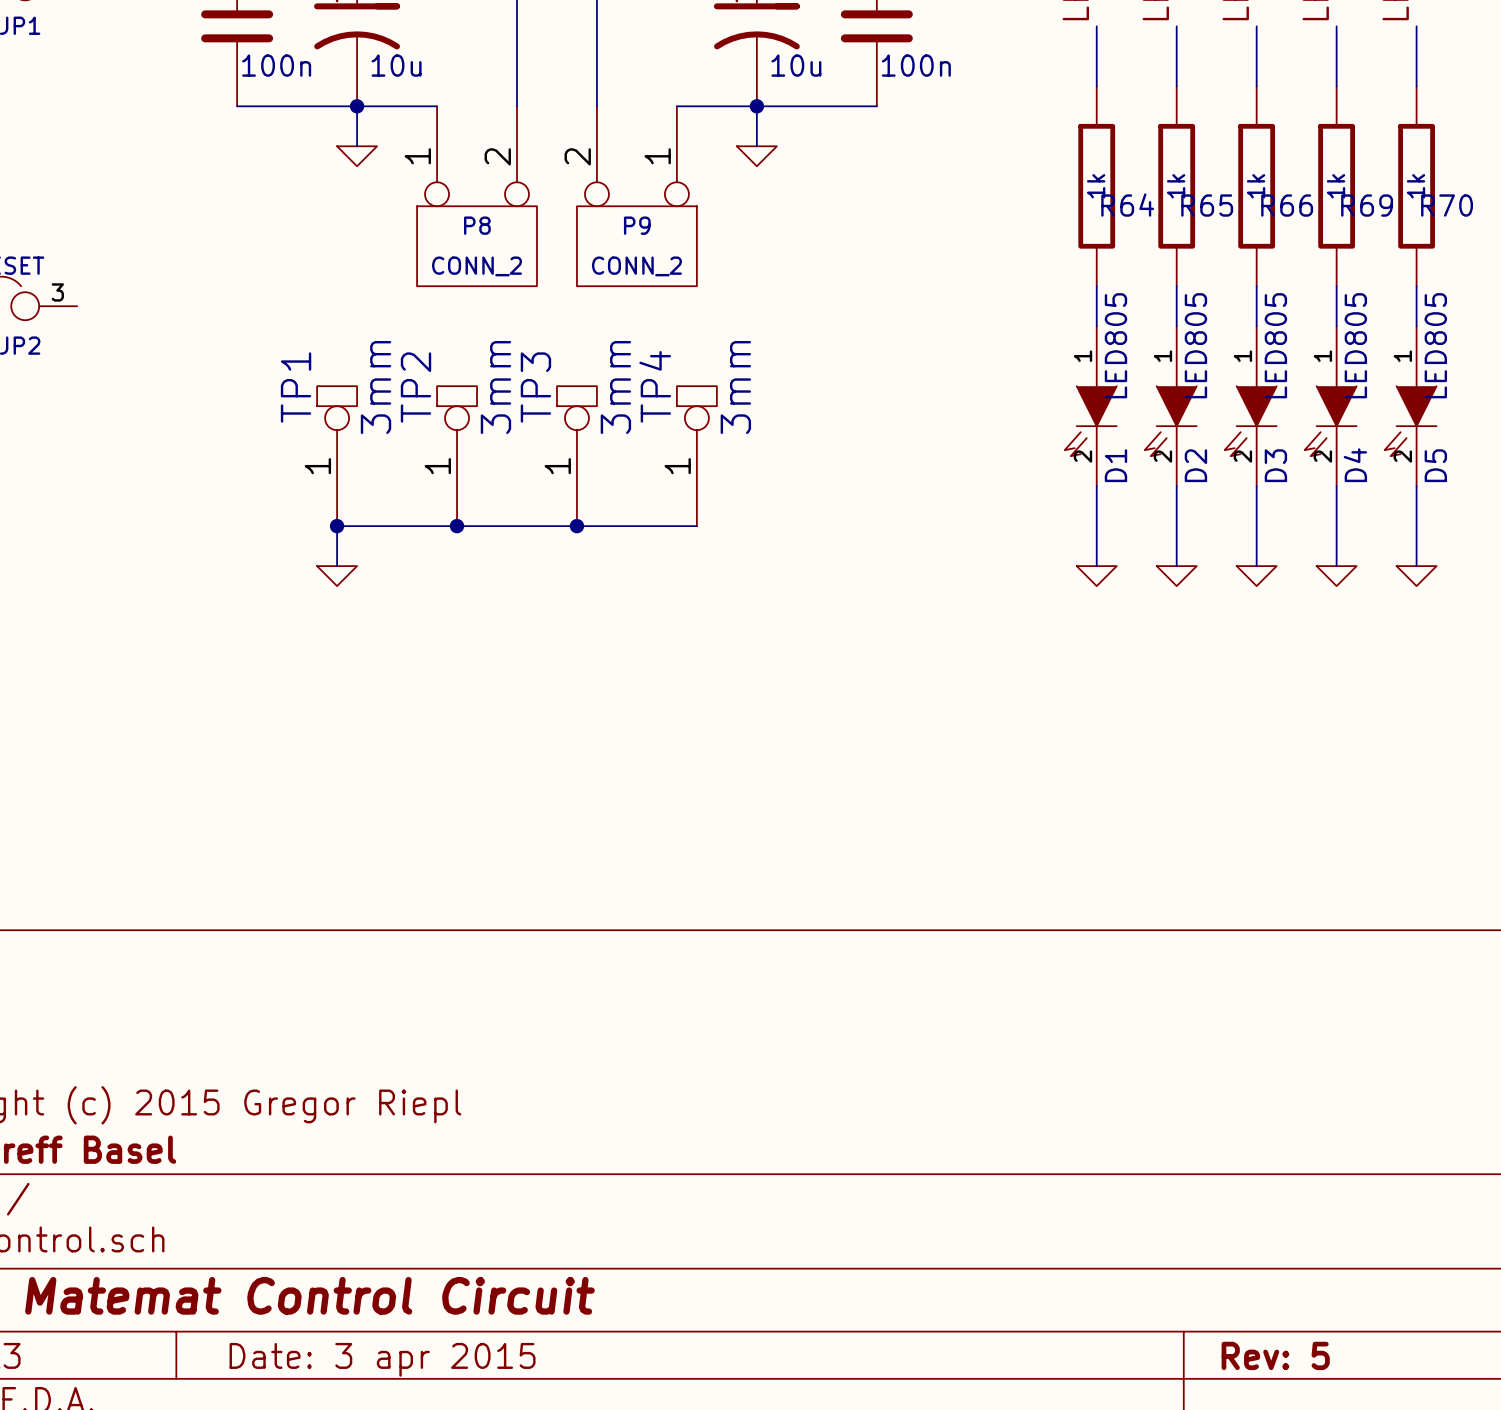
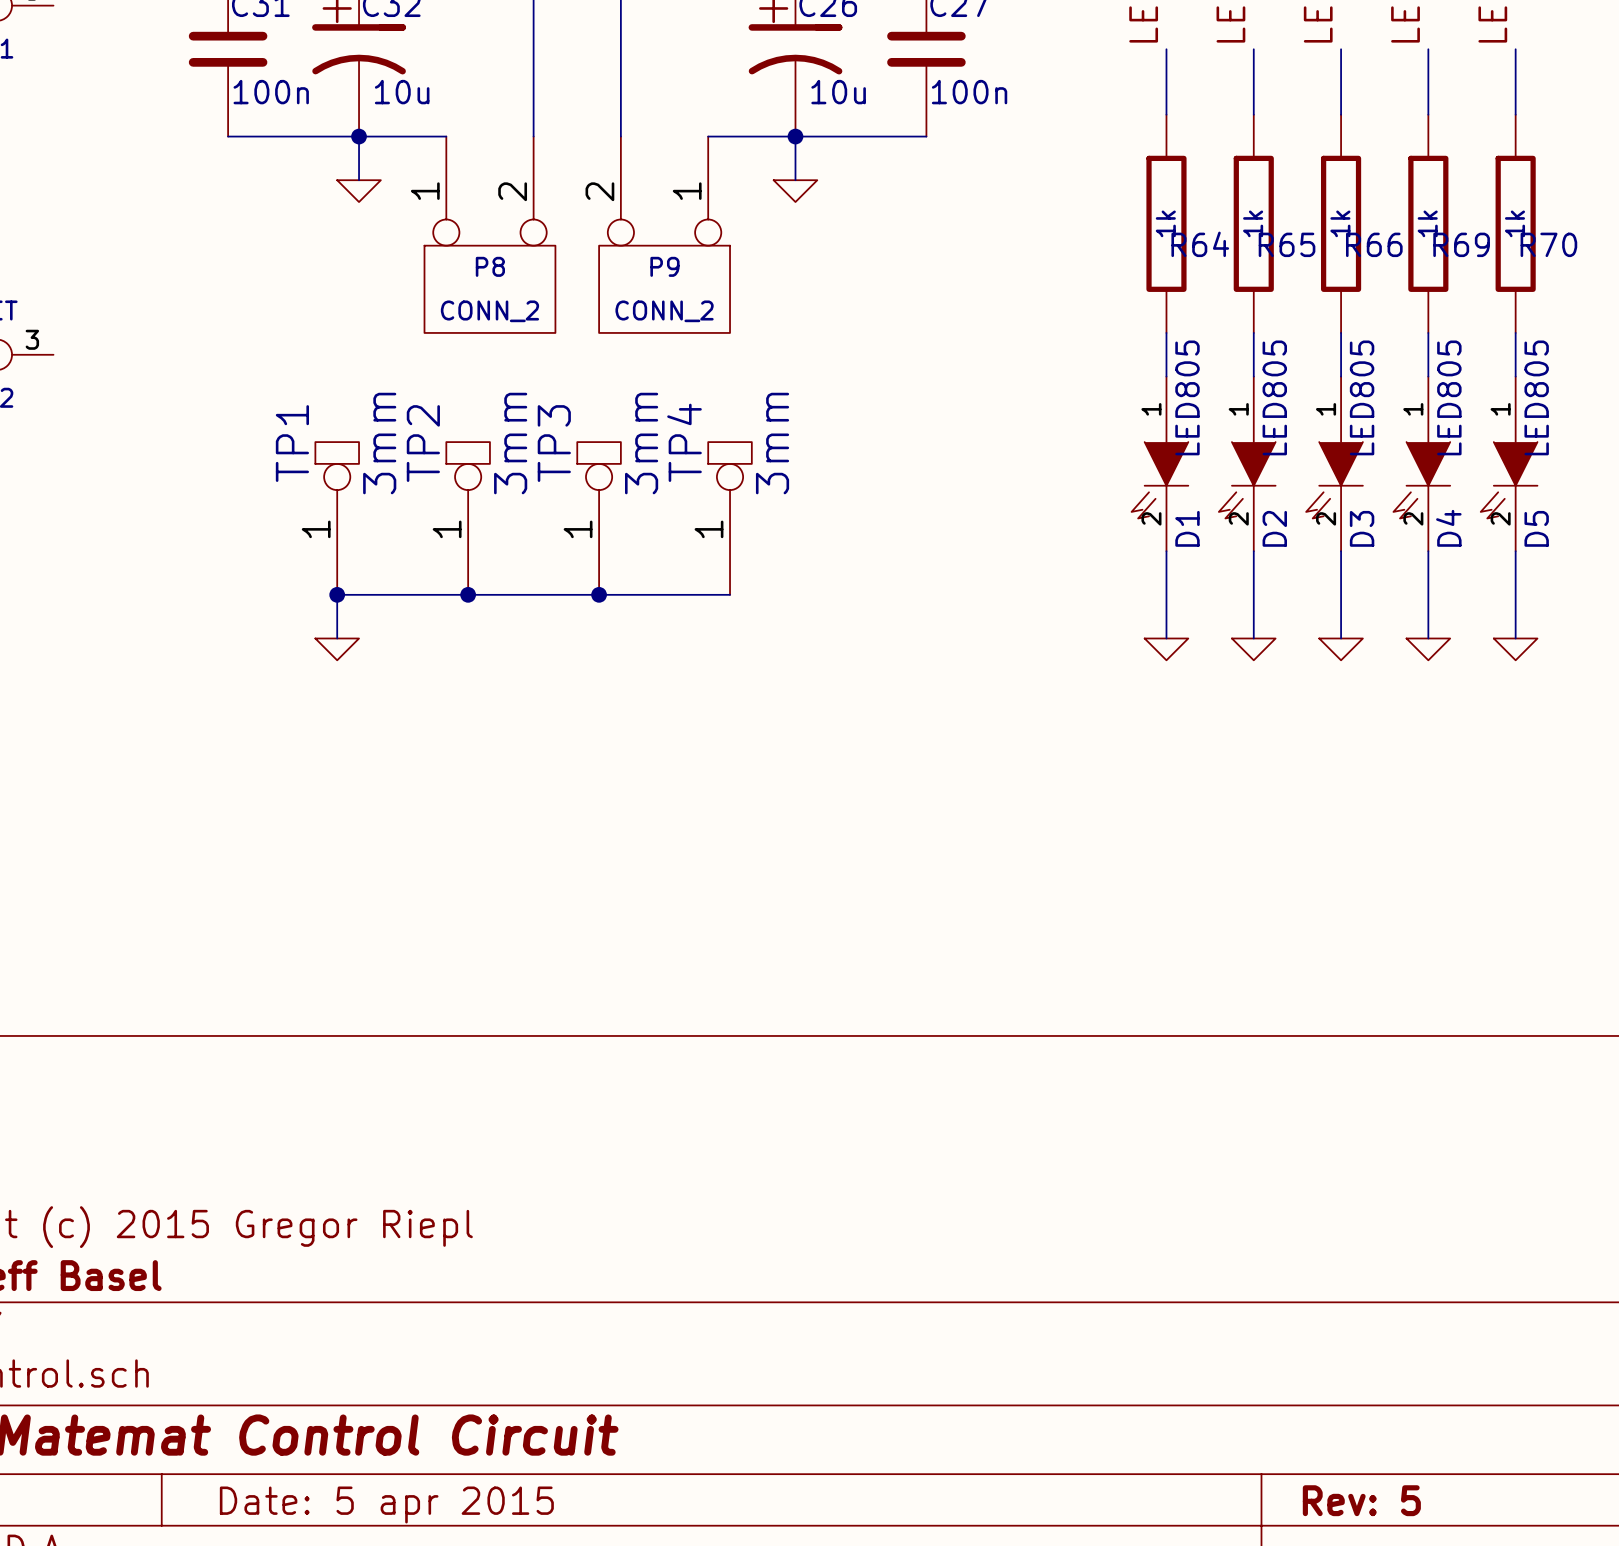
title block: Date: 3 apr 2015 (382, 1359) -> Date: 5 apr 2015 (386, 1504)

